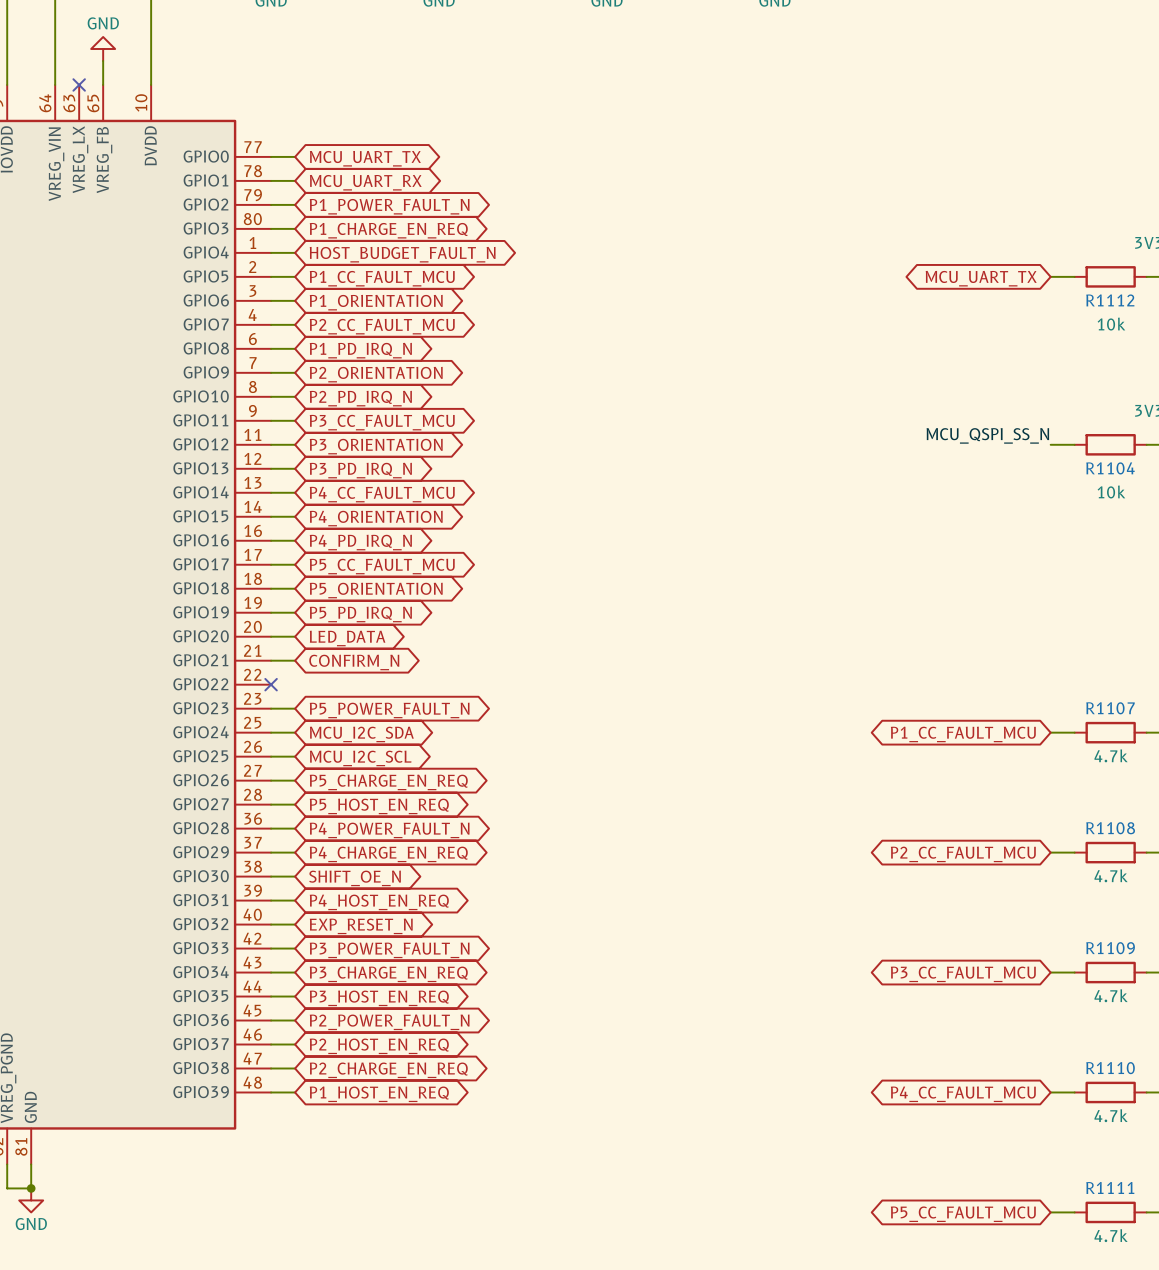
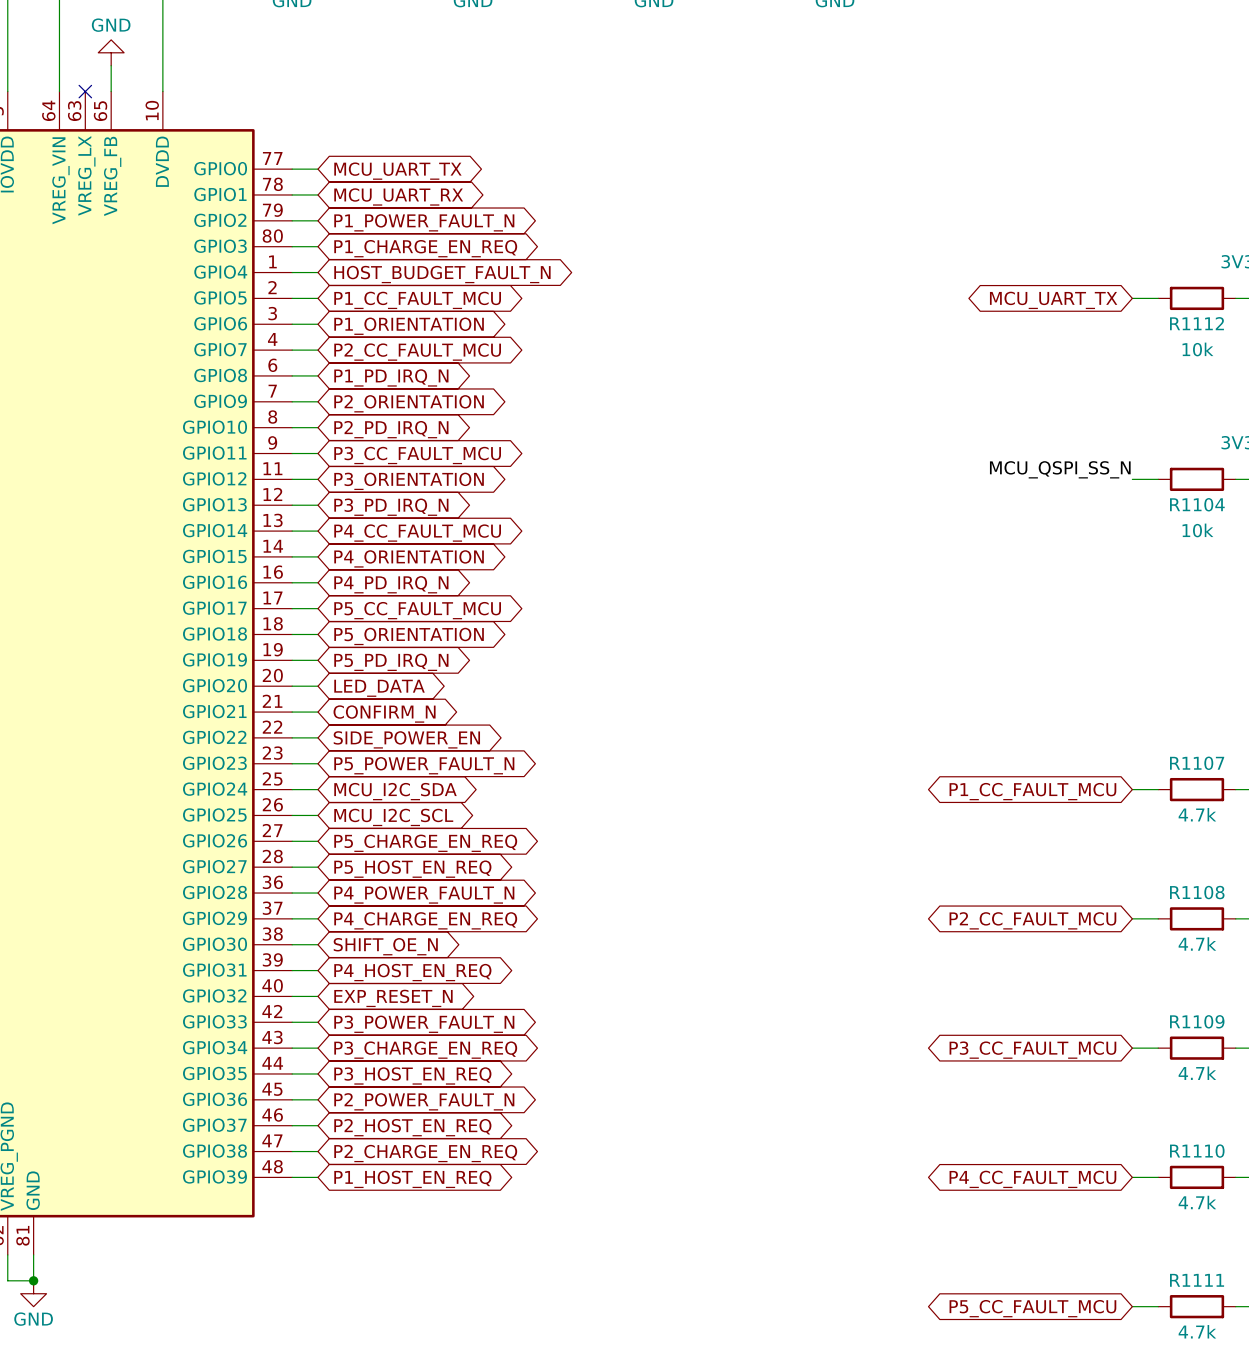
wire: none -> (292, 737) (318, 737)
no-connect mark: (271, 684) -> none
global label: none -> SIDE_POWER_EN (406, 739)

